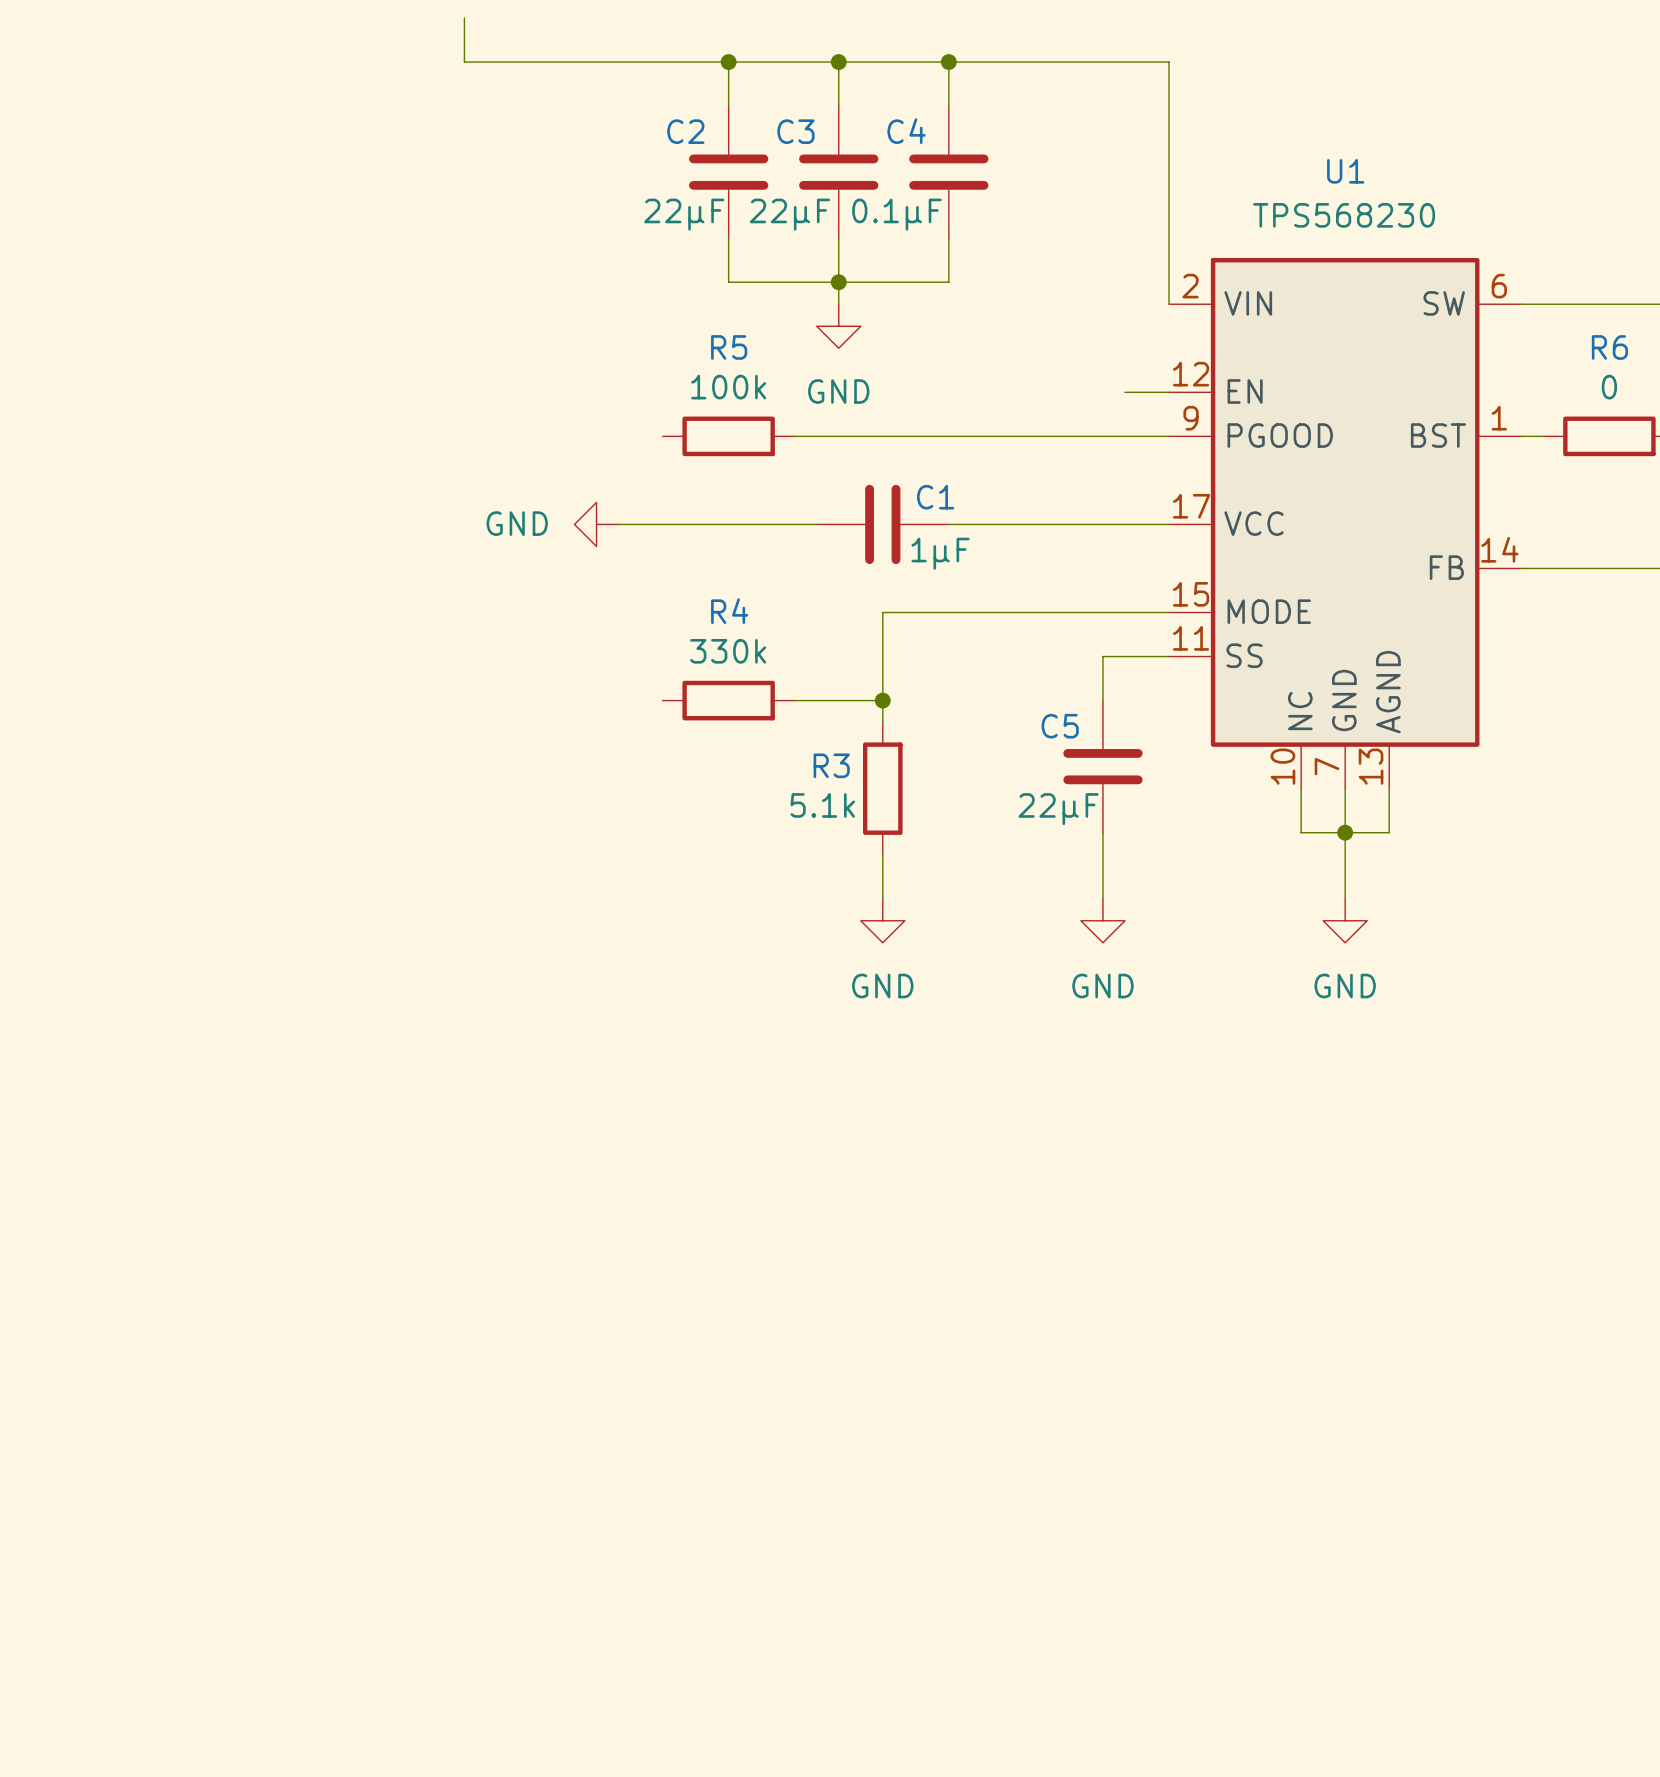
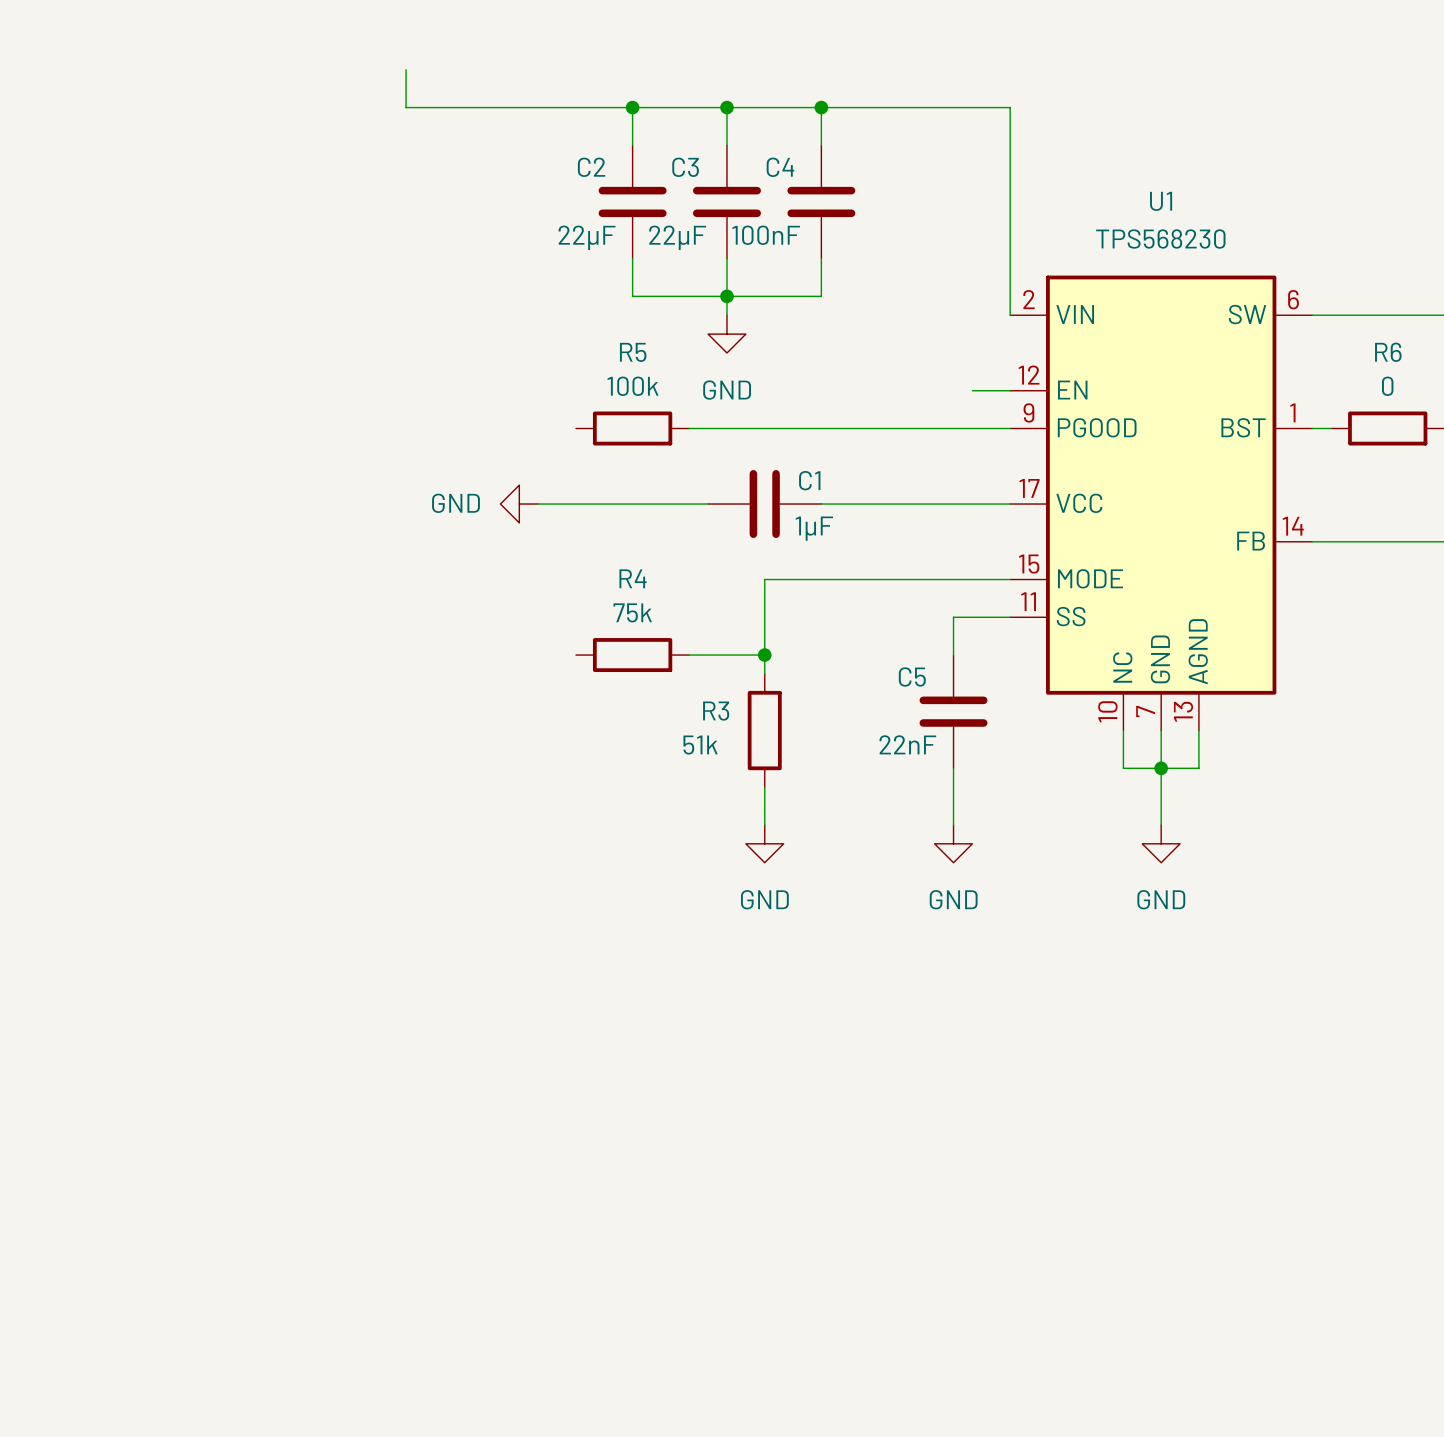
C4 value: 0.1µF (896, 214) -> 100nF (766, 235)
R4 value: 330k (728, 651) -> 75k (632, 612)
R3 value: 5.1k (822, 805) -> 51k (700, 745)
C5 value: 22µF (1058, 809) -> 22nF (907, 744)

